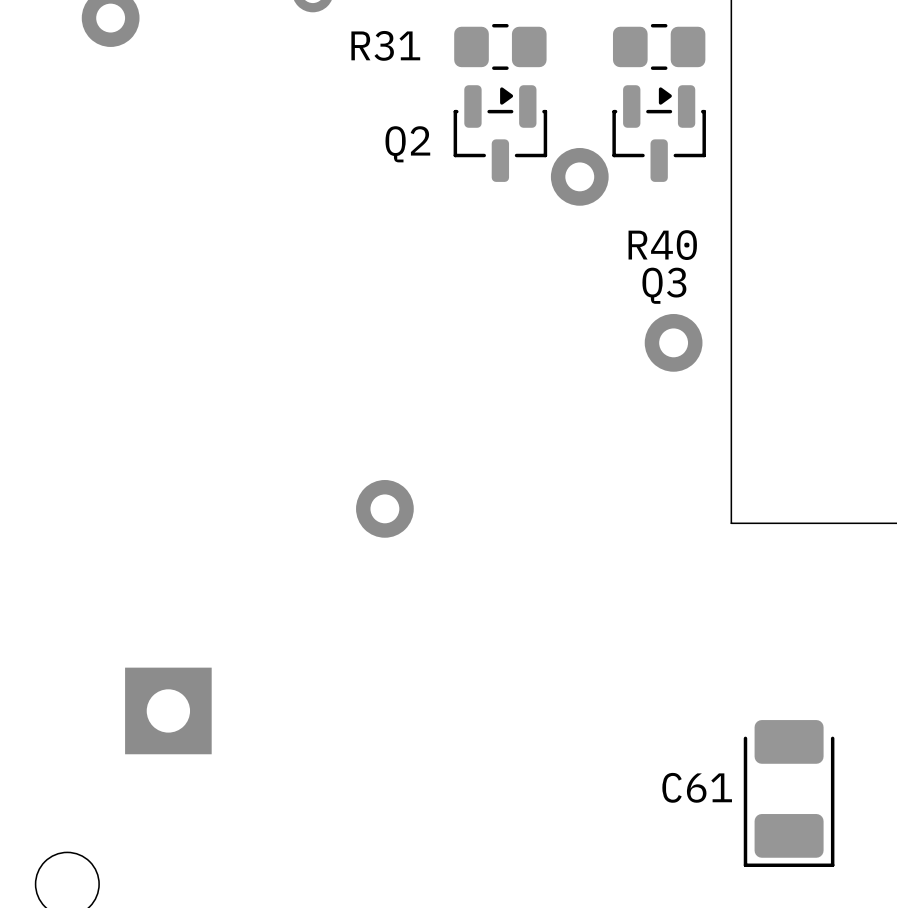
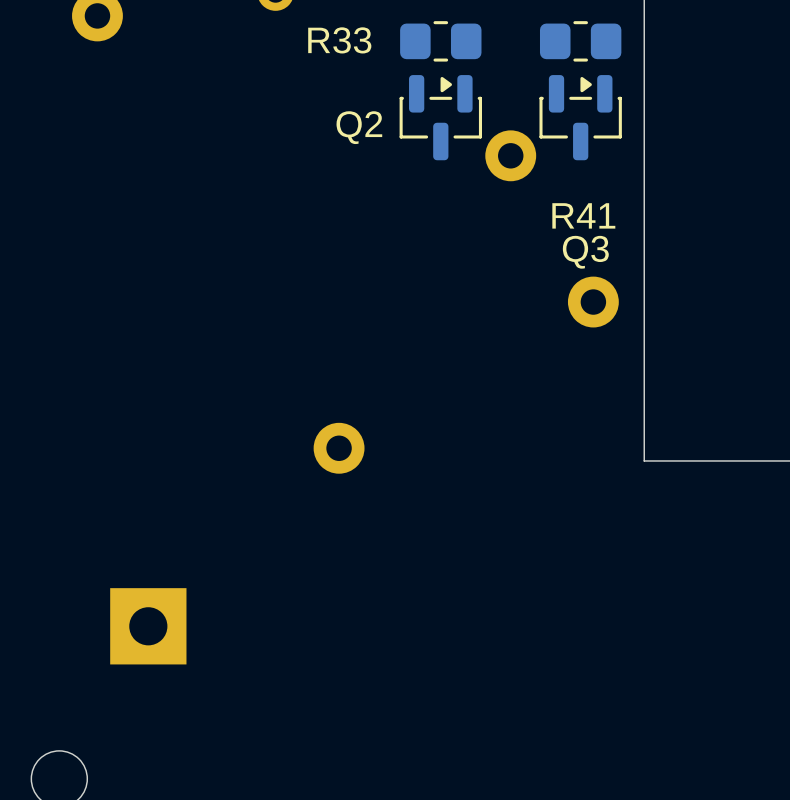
R31 name: R31 (385, 45) -> R33 (339, 40)
R40 name: R40 (662, 245) -> R41 (583, 215)
C61: (789, 793) -> none

